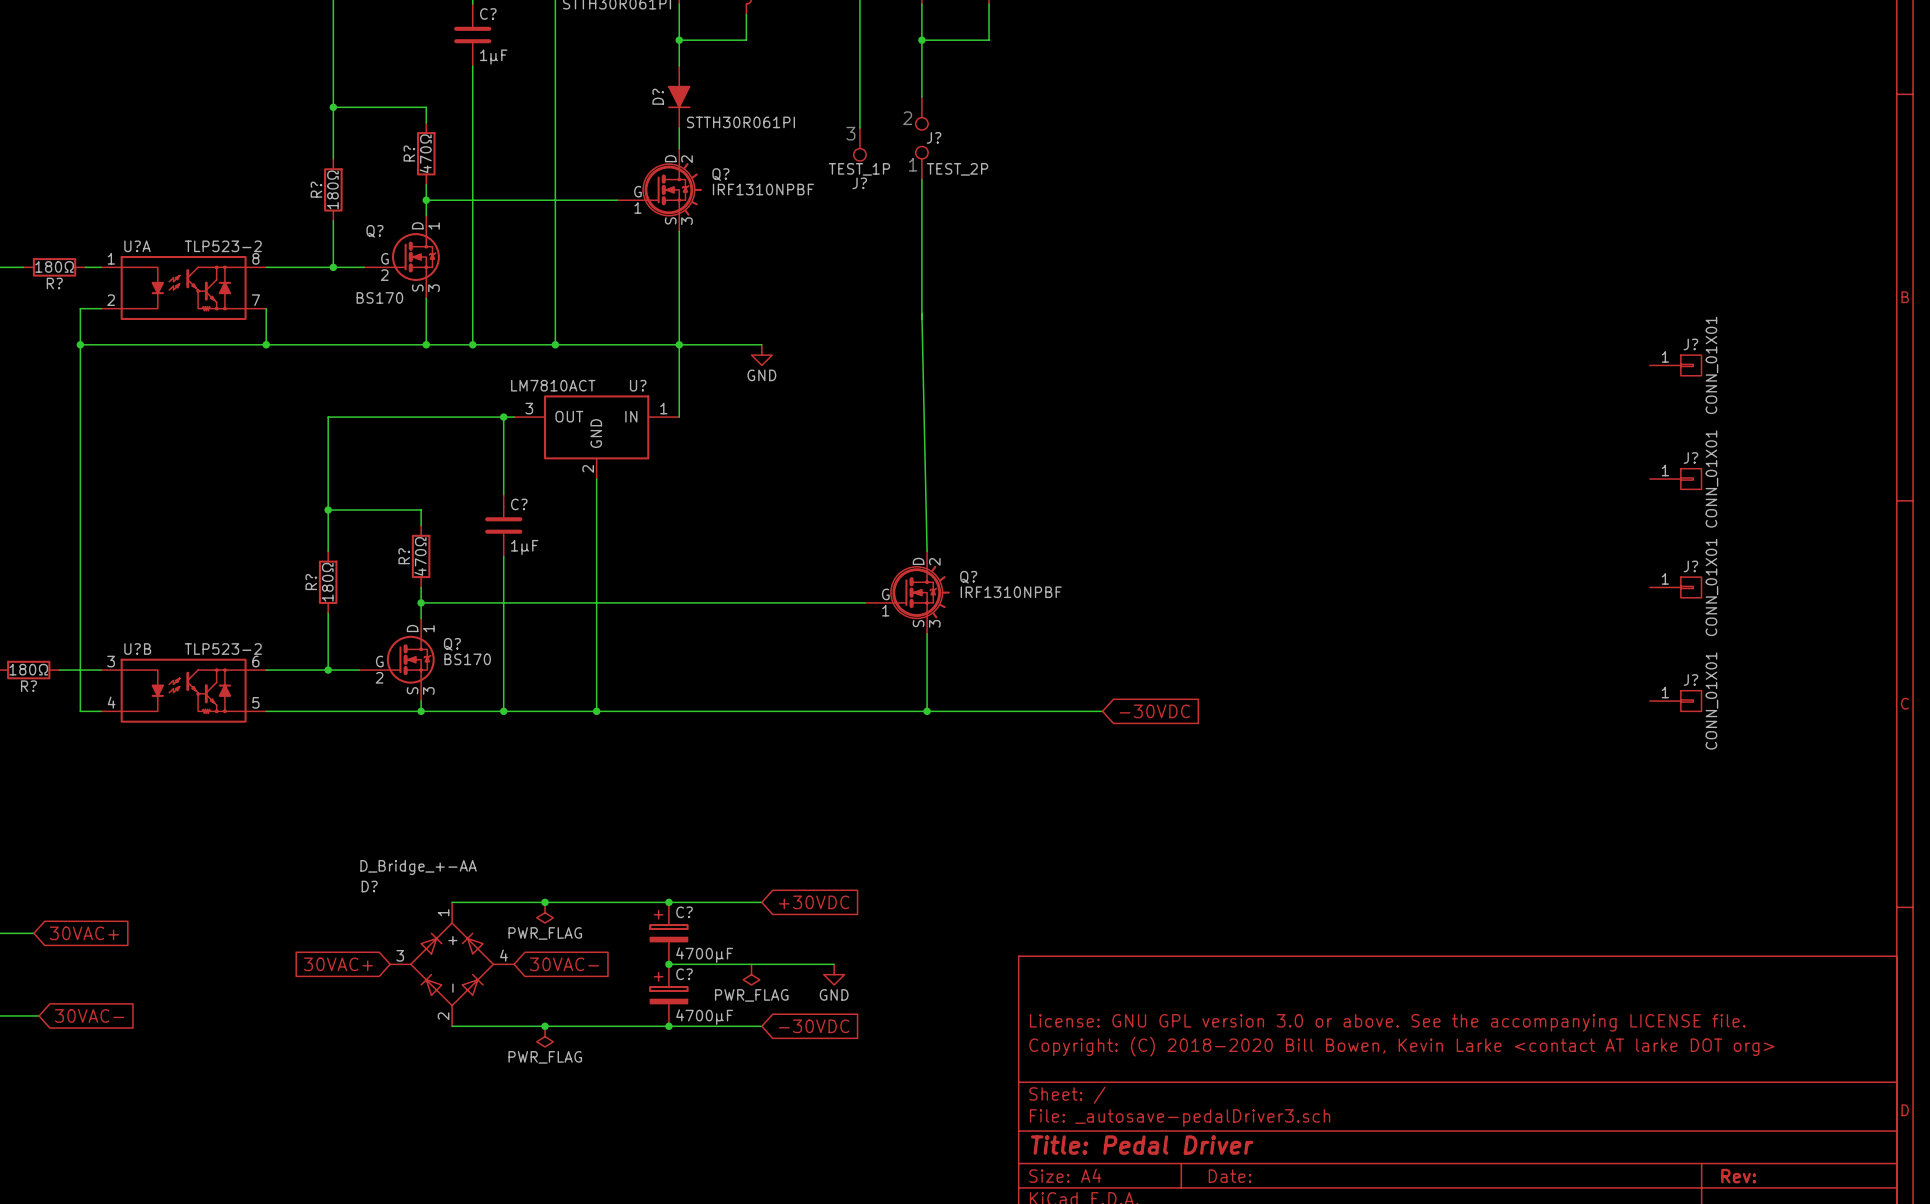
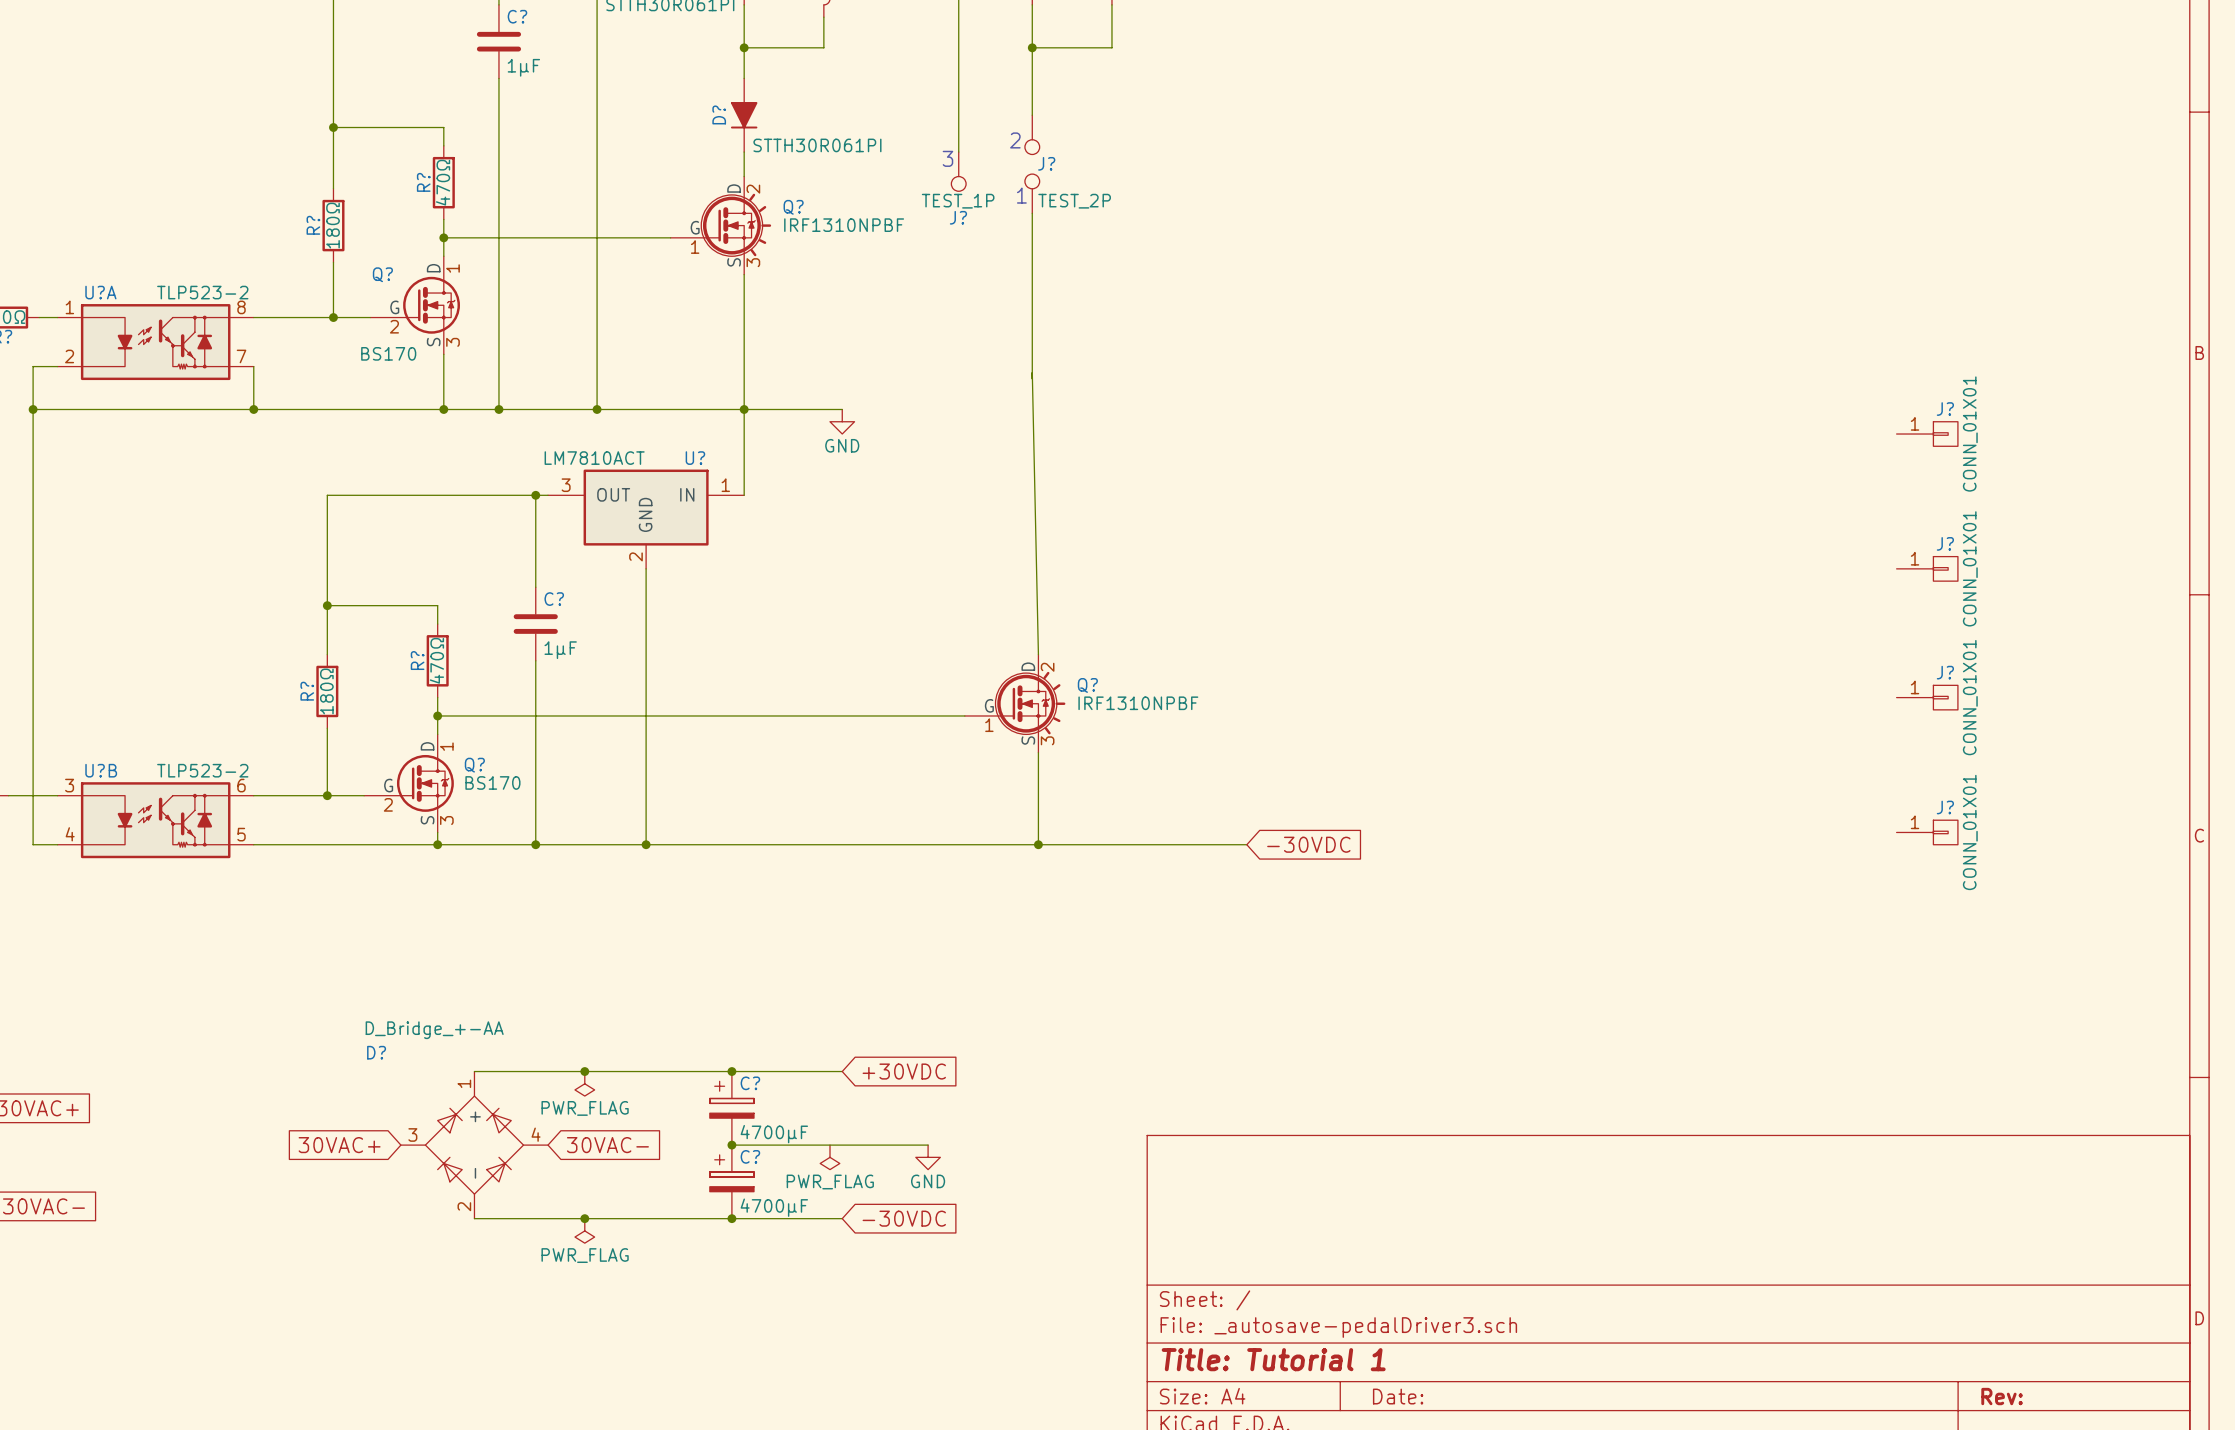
title block: License: GNU GPL version 3.0 or above. See the accompanying LICENSE file. (1387, 1022) -> none
title block: Copyright: (C) 2018-2020 Bill Bowen, Kevin Larke <contact AT larke DOT org> (1401, 1046) -> none
title block: Title: Pedal Driver (1142, 1145) -> Title: Tutorial 1 (1273, 1359)

